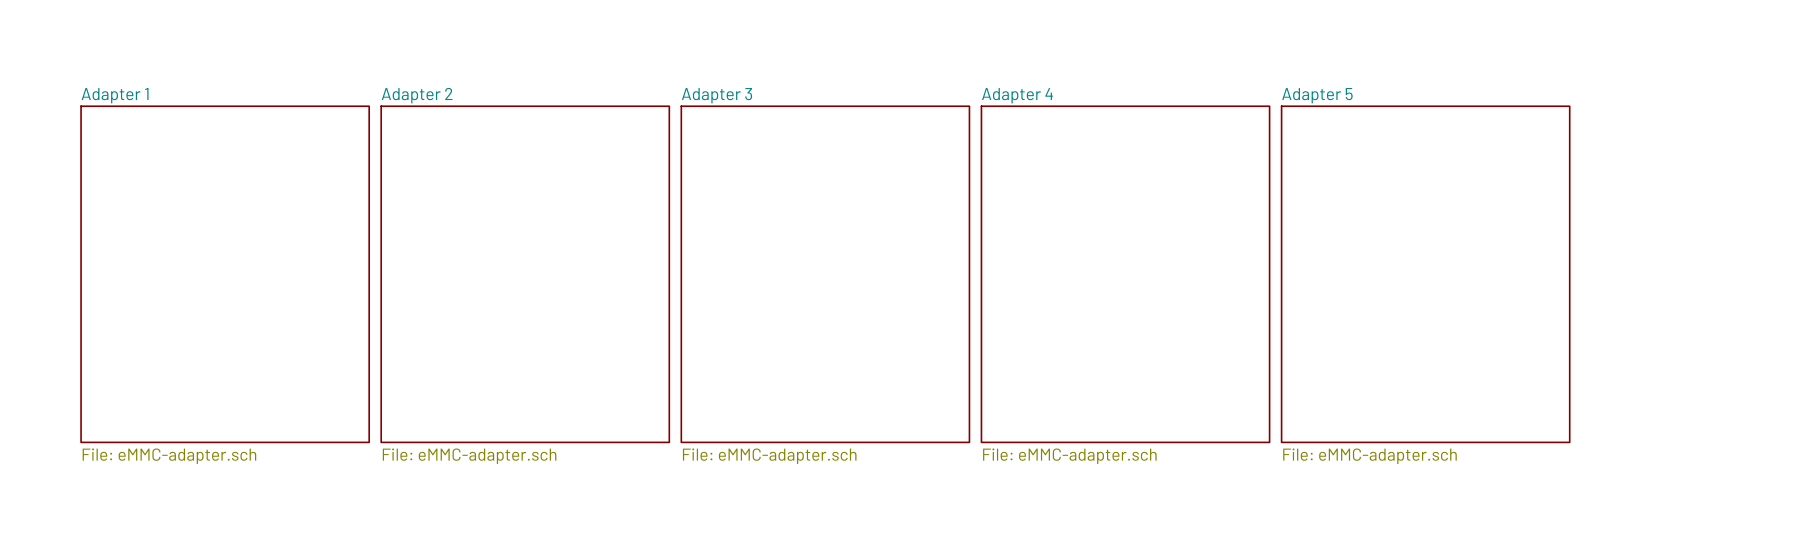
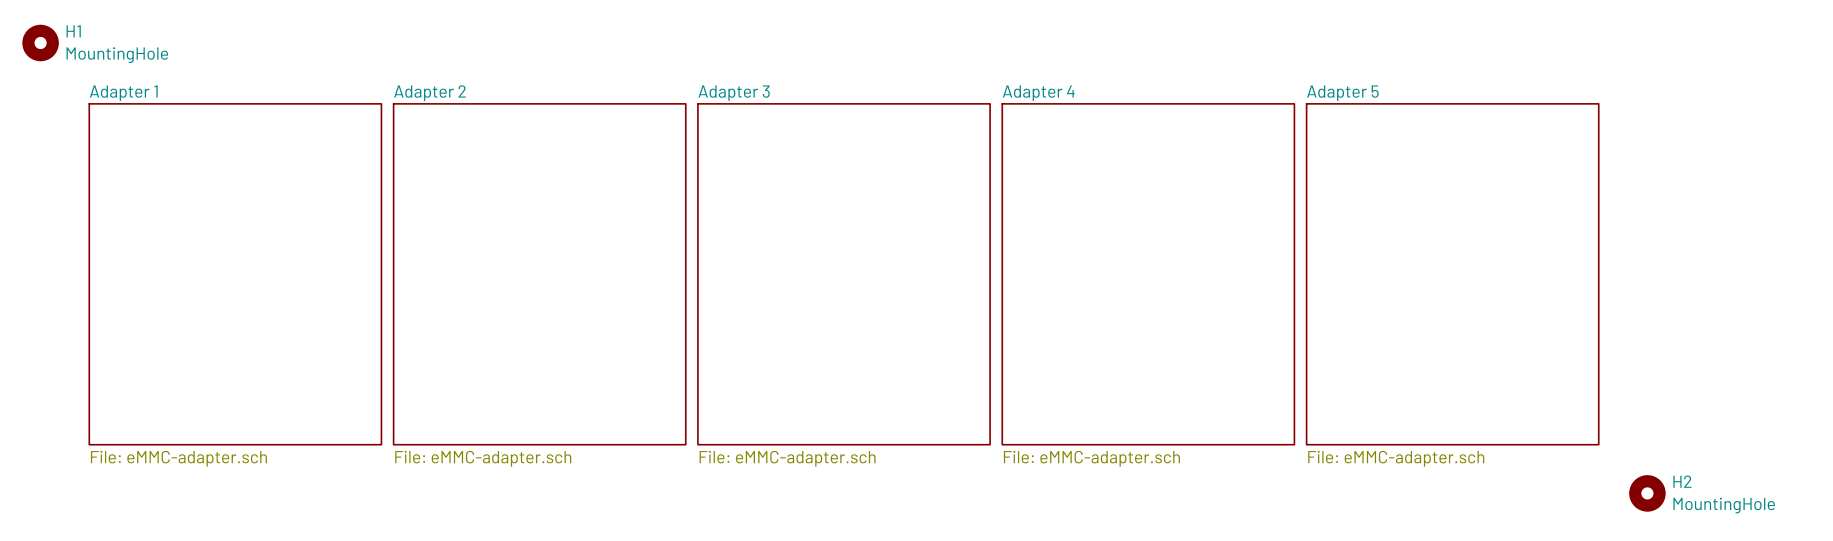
H1: none -> MountingHole (40, 43)
H2: none -> MountingHole (1647, 493)

